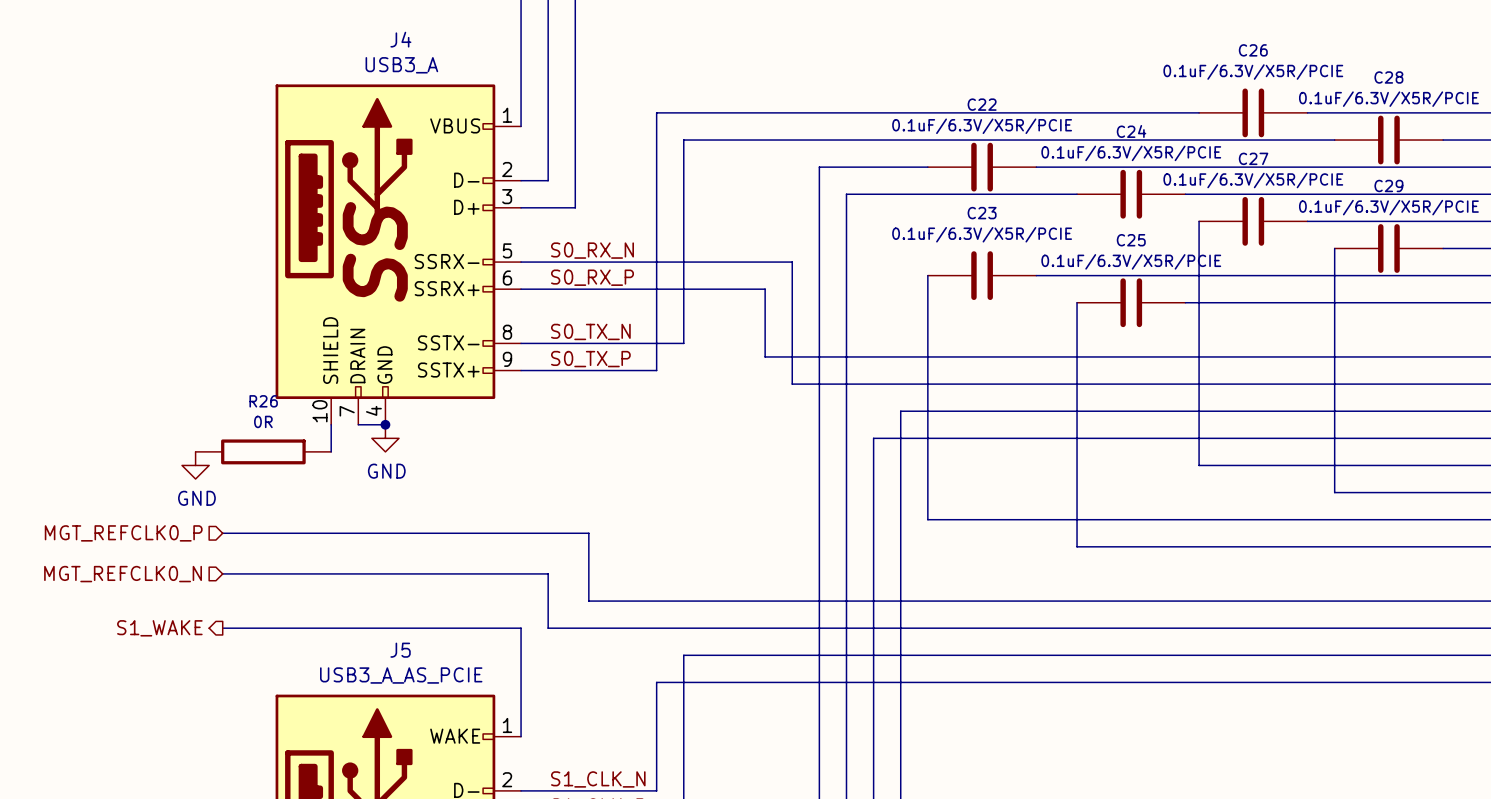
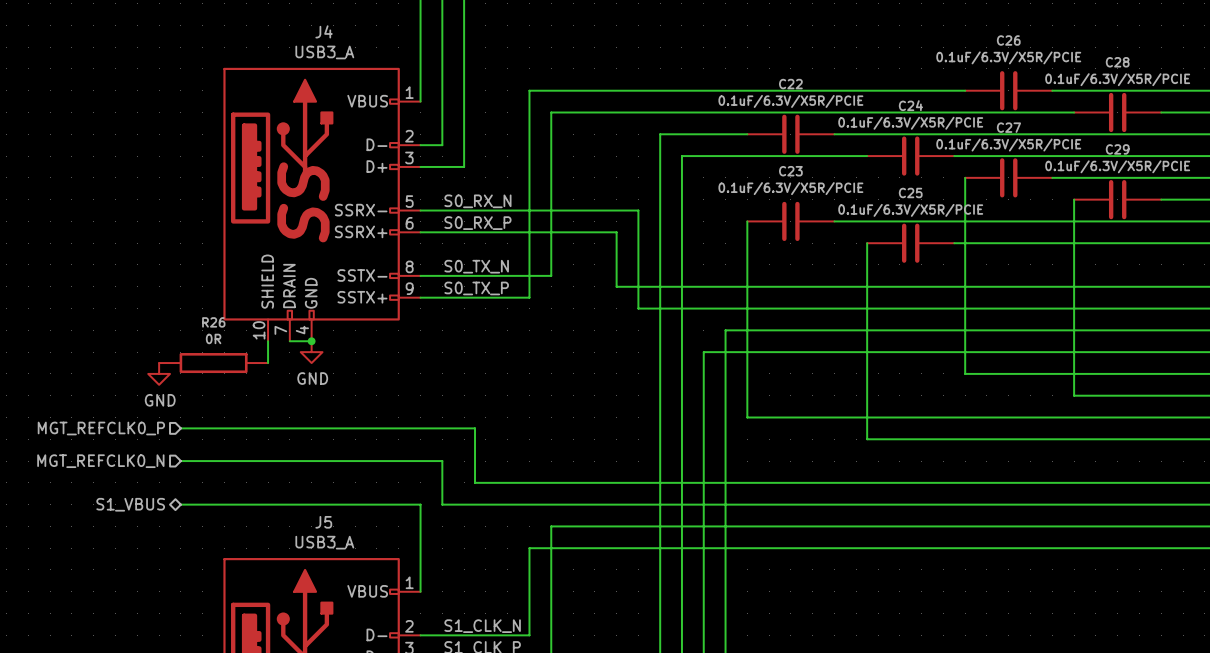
hierarchical label shape: output (159, 628) -> bidirectional (130, 504)
hierarchical label: S1_WAKE (159, 628) -> S1_VBUS (130, 504)
J5 value: USB3_A_AS_PCIE (401, 675) -> USB3_A (324, 542)
J5 pin name: WAKE (455, 736) -> VBUS (367, 591)

